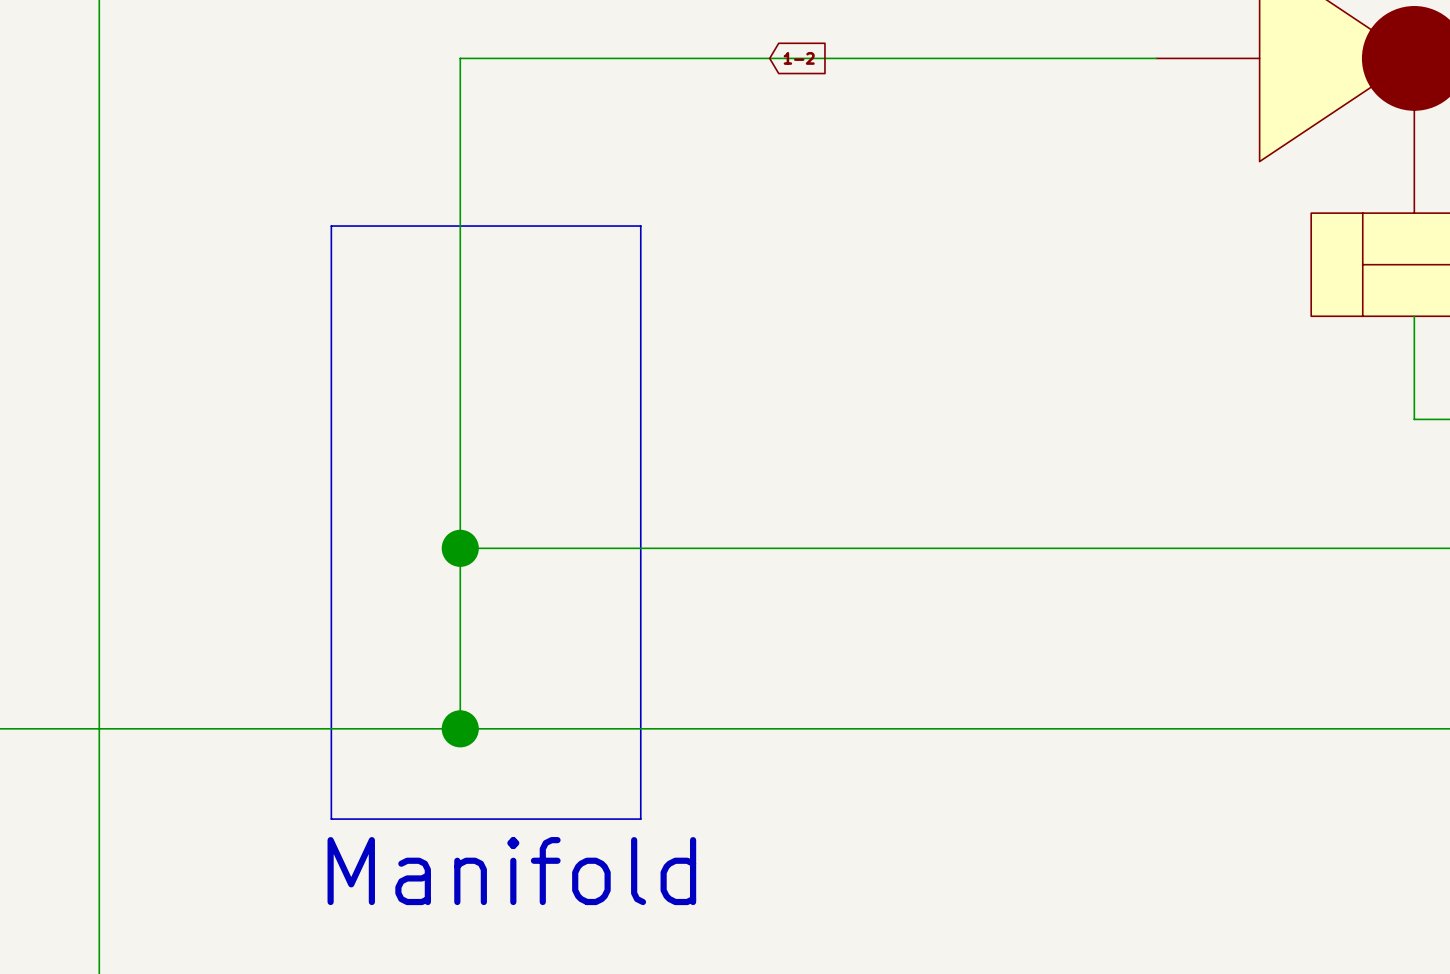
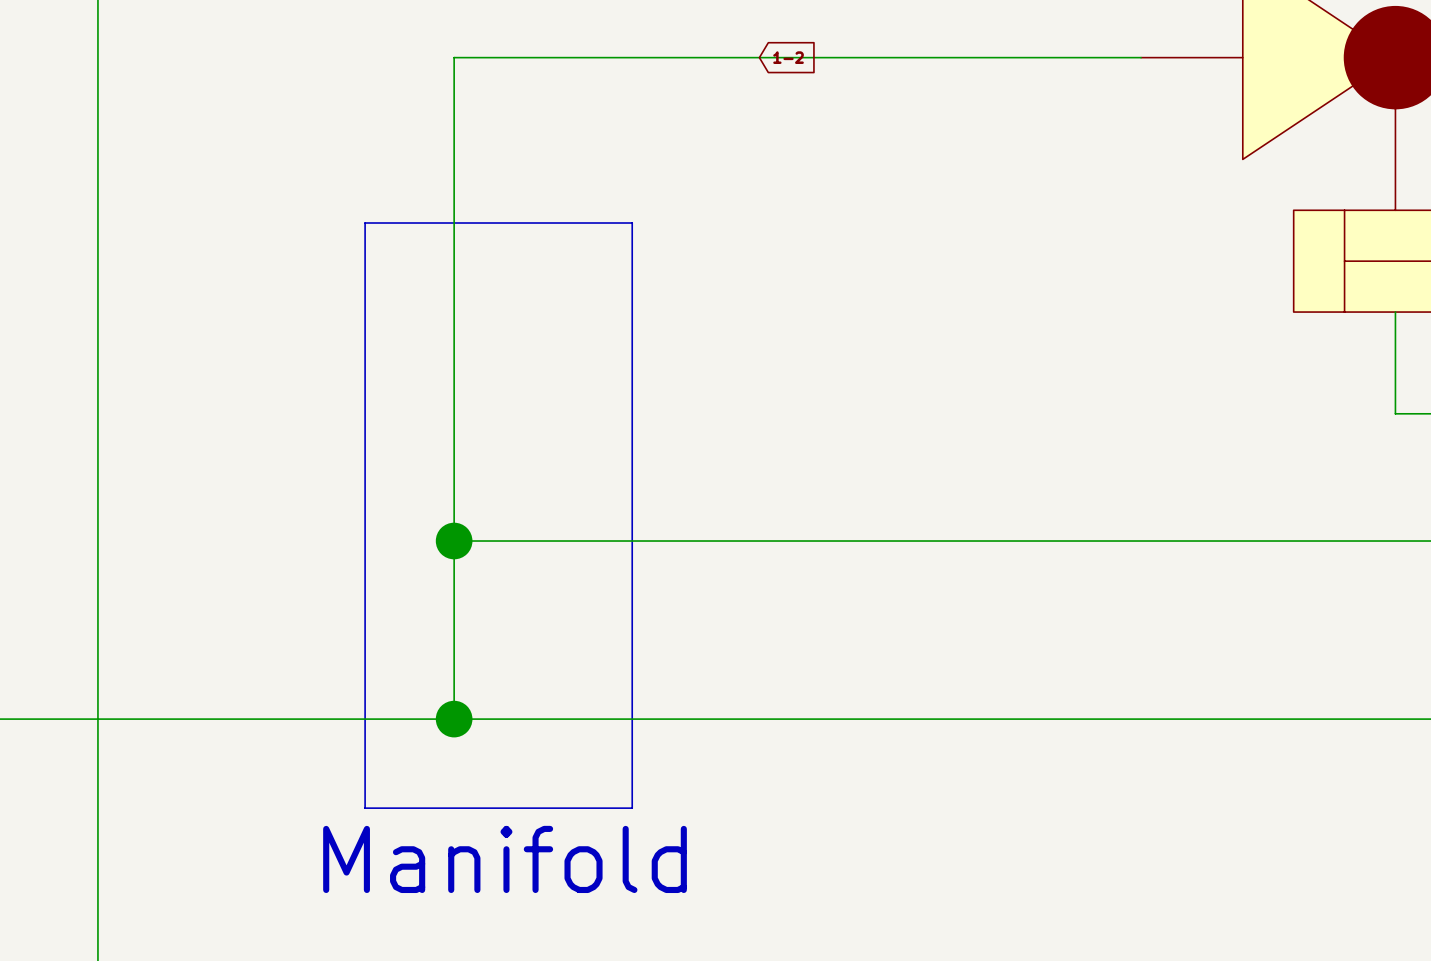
line: (370, 226) (331, 226) (331, 819) (370, 819) -> (365, 223) (365, 808)

